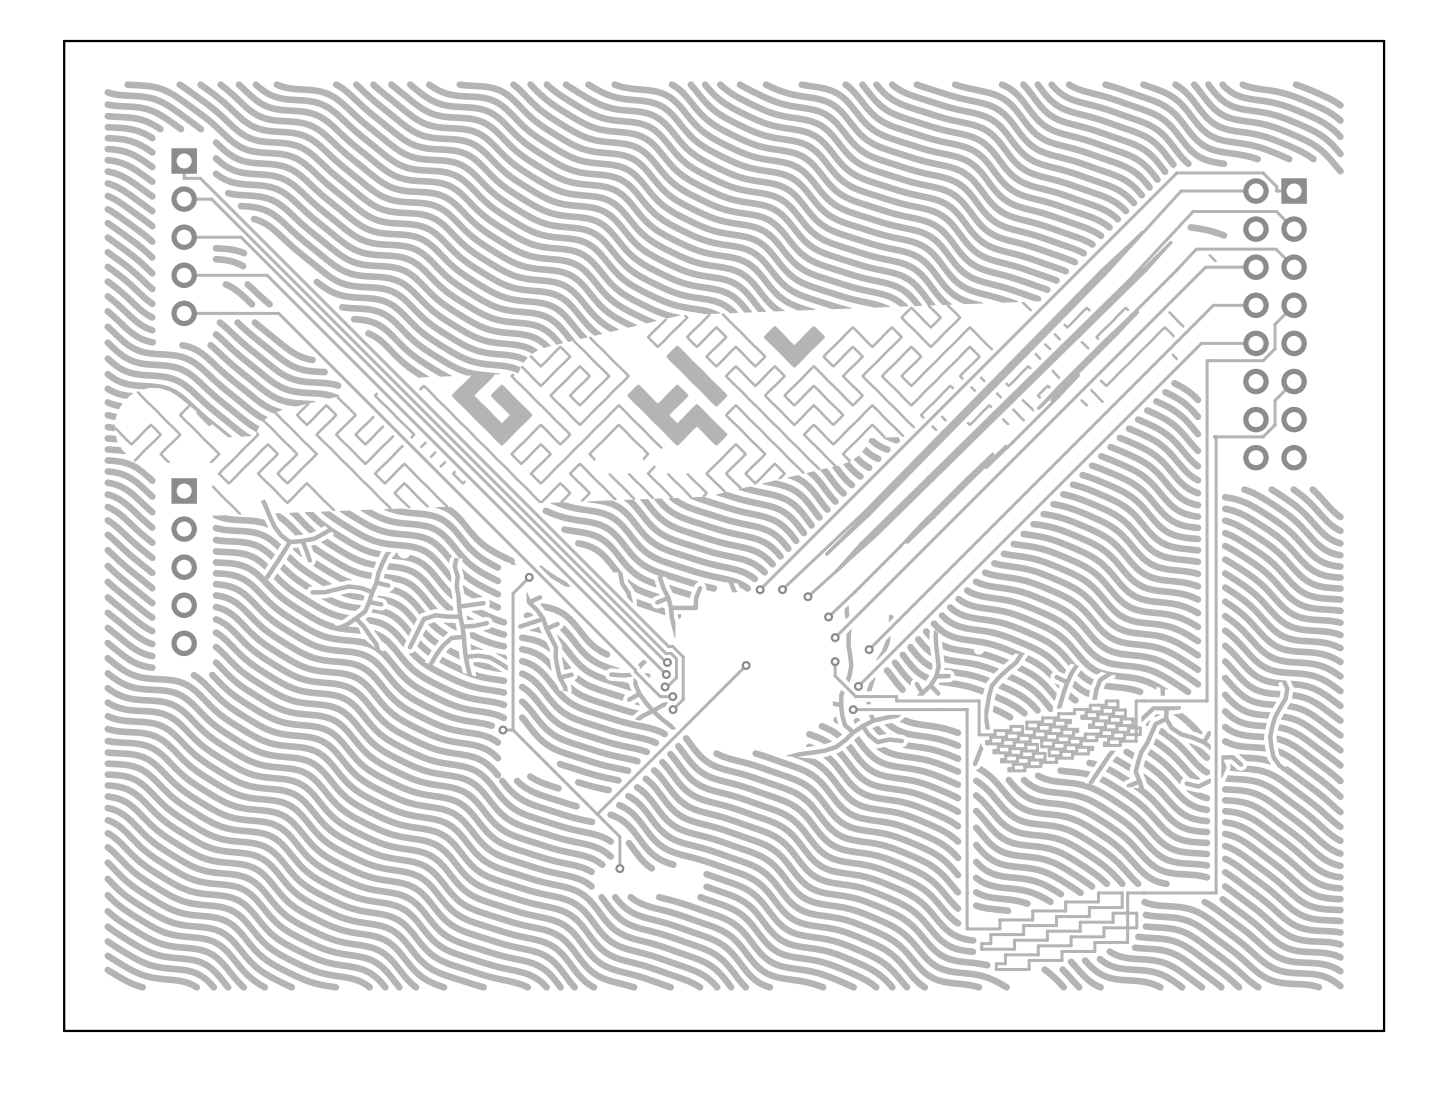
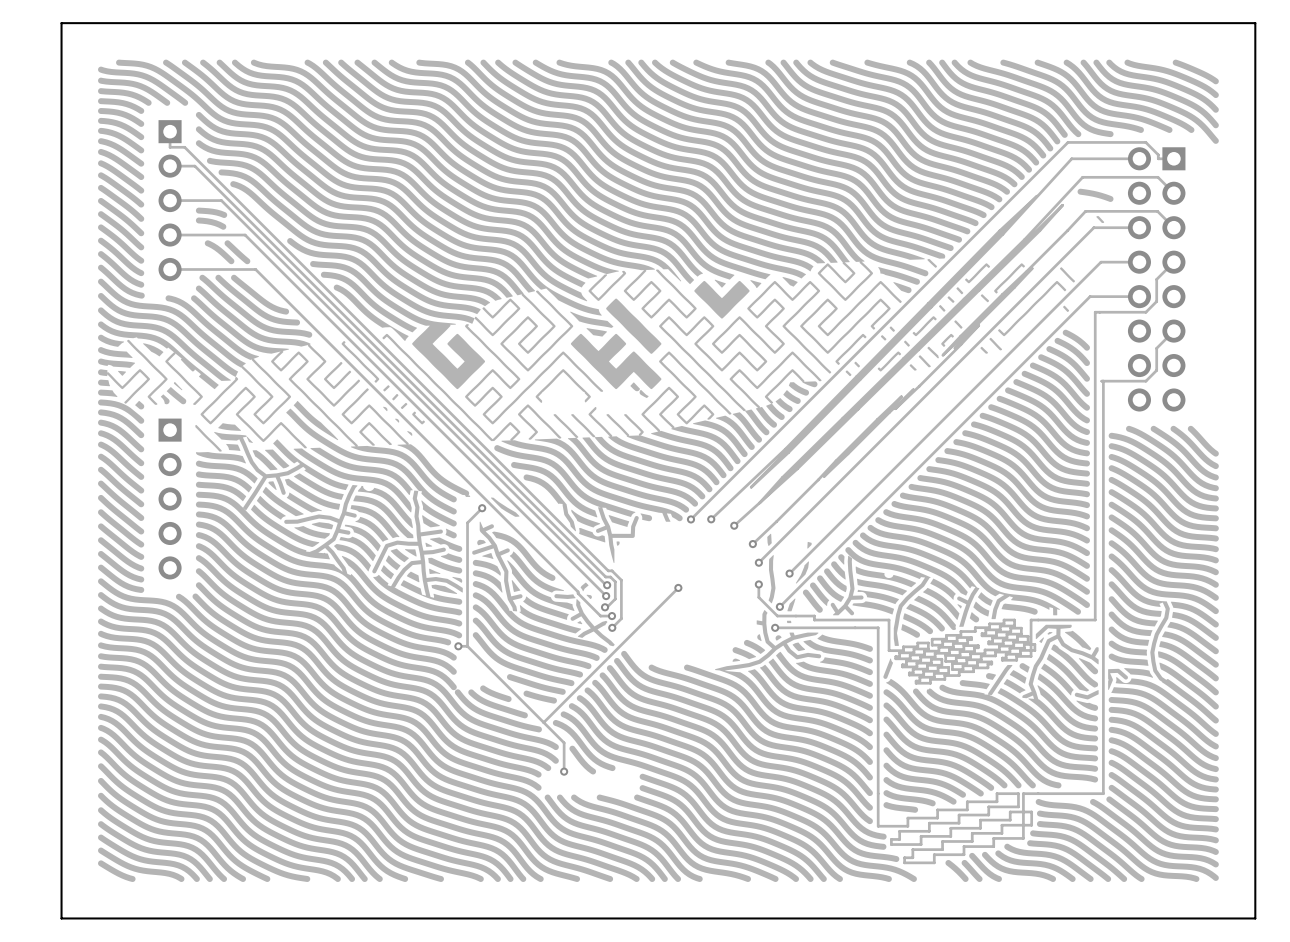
drawing: [124, 81, 984, 378] -> none
drawing: none -> [116, 59, 929, 341]
drawing shape: [197, 81, 638, 328] -> [181, 59, 586, 288]
drawing shape: [273, 81, 739, 314] -> [250, 59, 682, 282]
drawing shape: [353, 81, 767, 313] -> [322, 59, 703, 277]
drawing shape: [426, 81, 890, 308] -> [388, 59, 814, 272]
drawing shape: [104, 370, 233, 464] -> [98, 321, 219, 406]
drawing: none -> [143, 343, 164, 357]
drawing shape: [104, 399, 123, 410] -> [98, 347, 133, 358]
drawing shape: [104, 411, 117, 421] -> [98, 358, 136, 368]
drawing: none -> [118, 370, 126, 376]
drawing: none -> [160, 381, 187, 405]
drawing: none -> [630, 382, 649, 399]
drawing: none -> [135, 400, 145, 410]
drawing: none -> [286, 400, 457, 515]
drawing: none -> [218, 423, 253, 451]
drawing shape: [260, 499, 382, 580] -> [214, 431, 349, 511]
drawing: [360, 509, 502, 585] -> none

